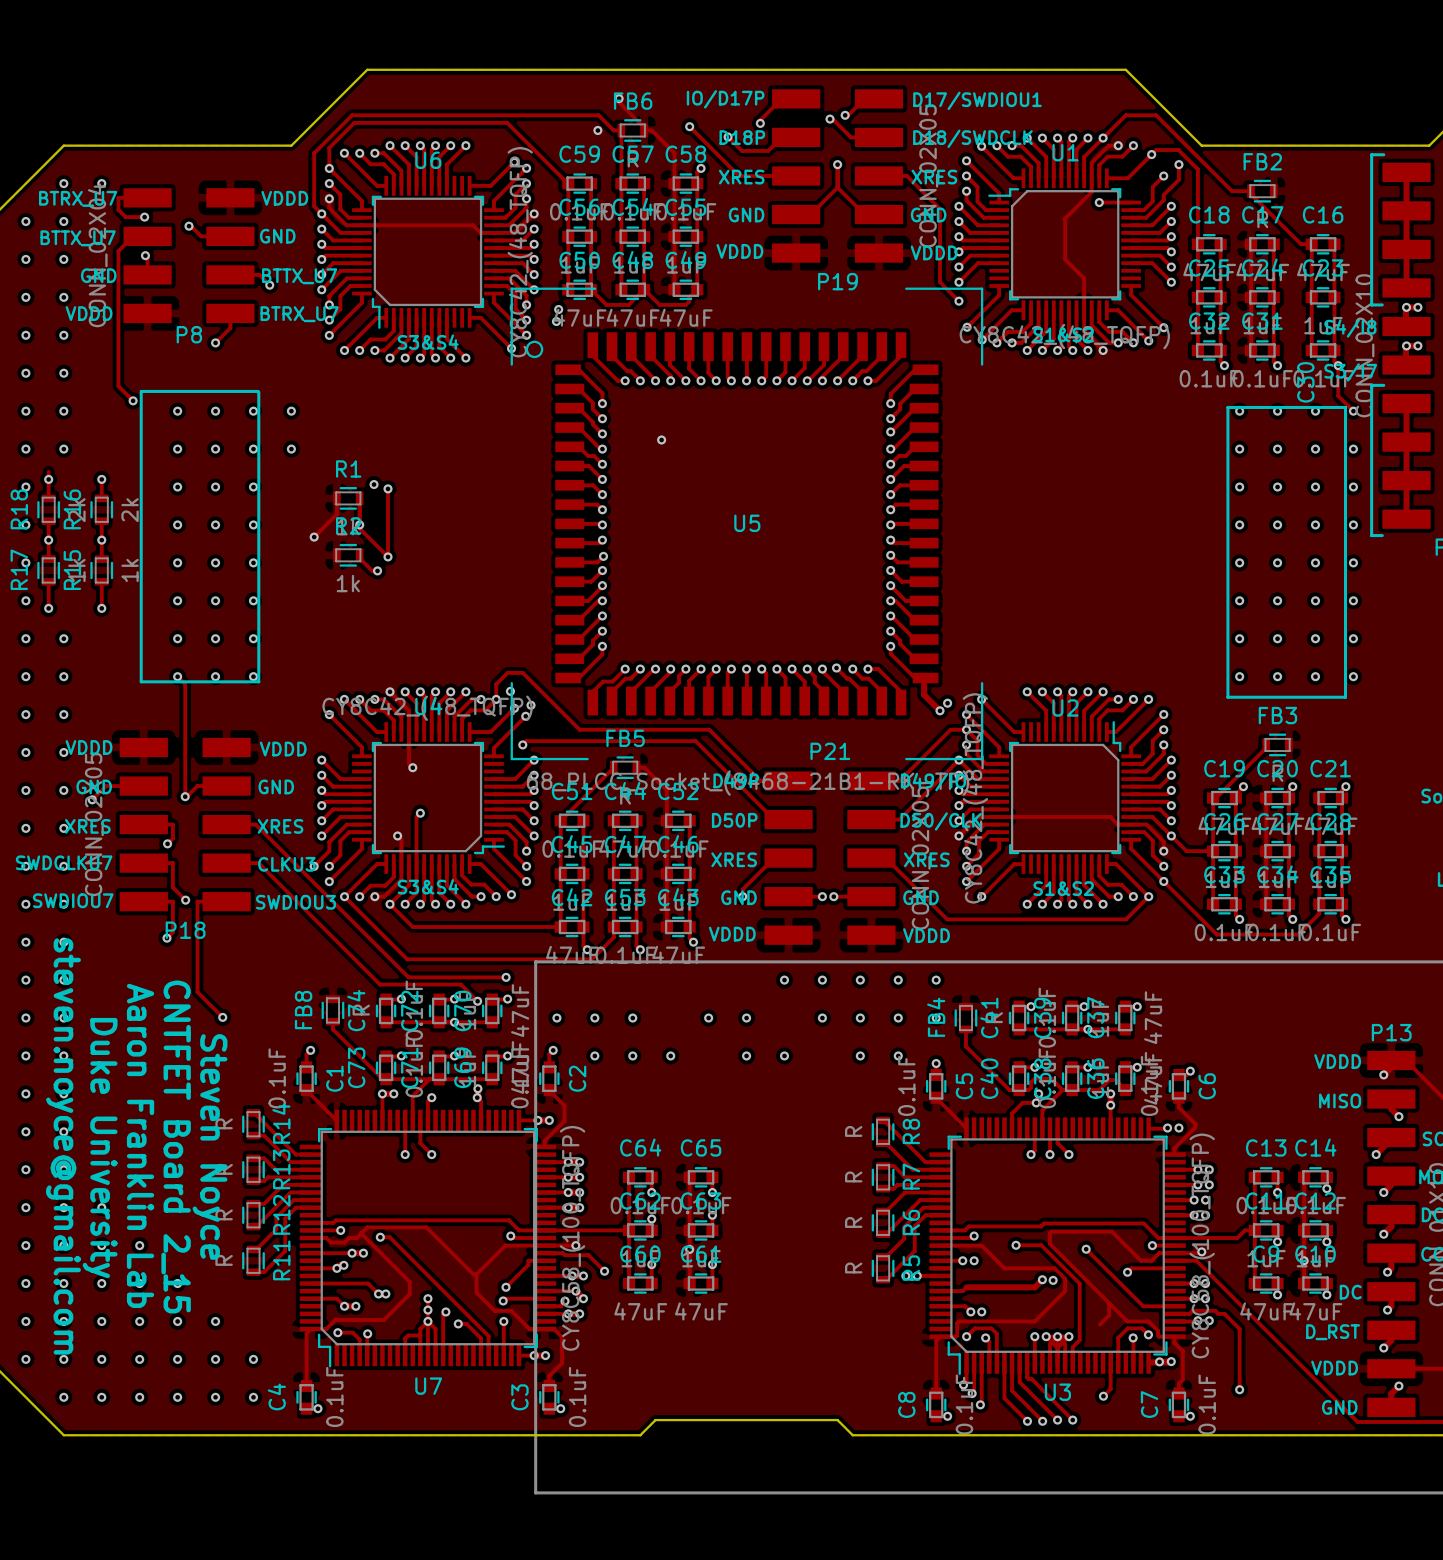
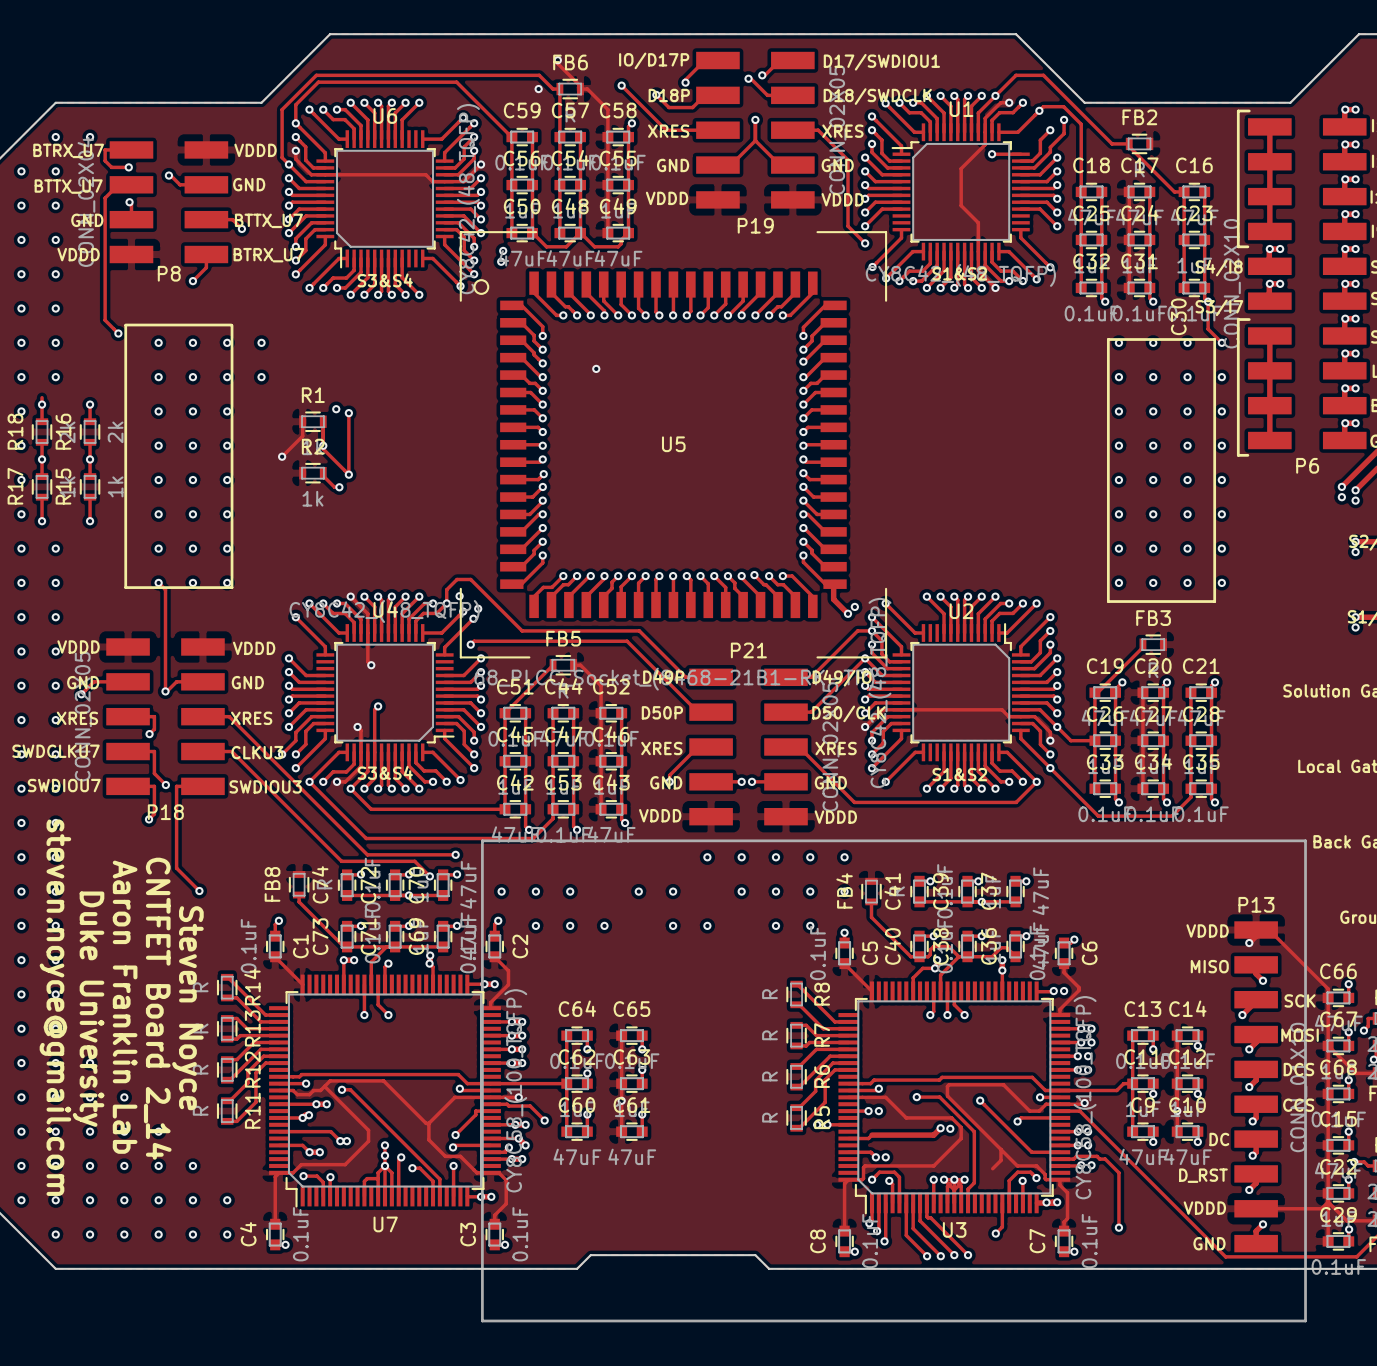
text: CNTFET Board 2_15 (176, 1146) -> CNTFET Board 2_14 (157, 1008)

